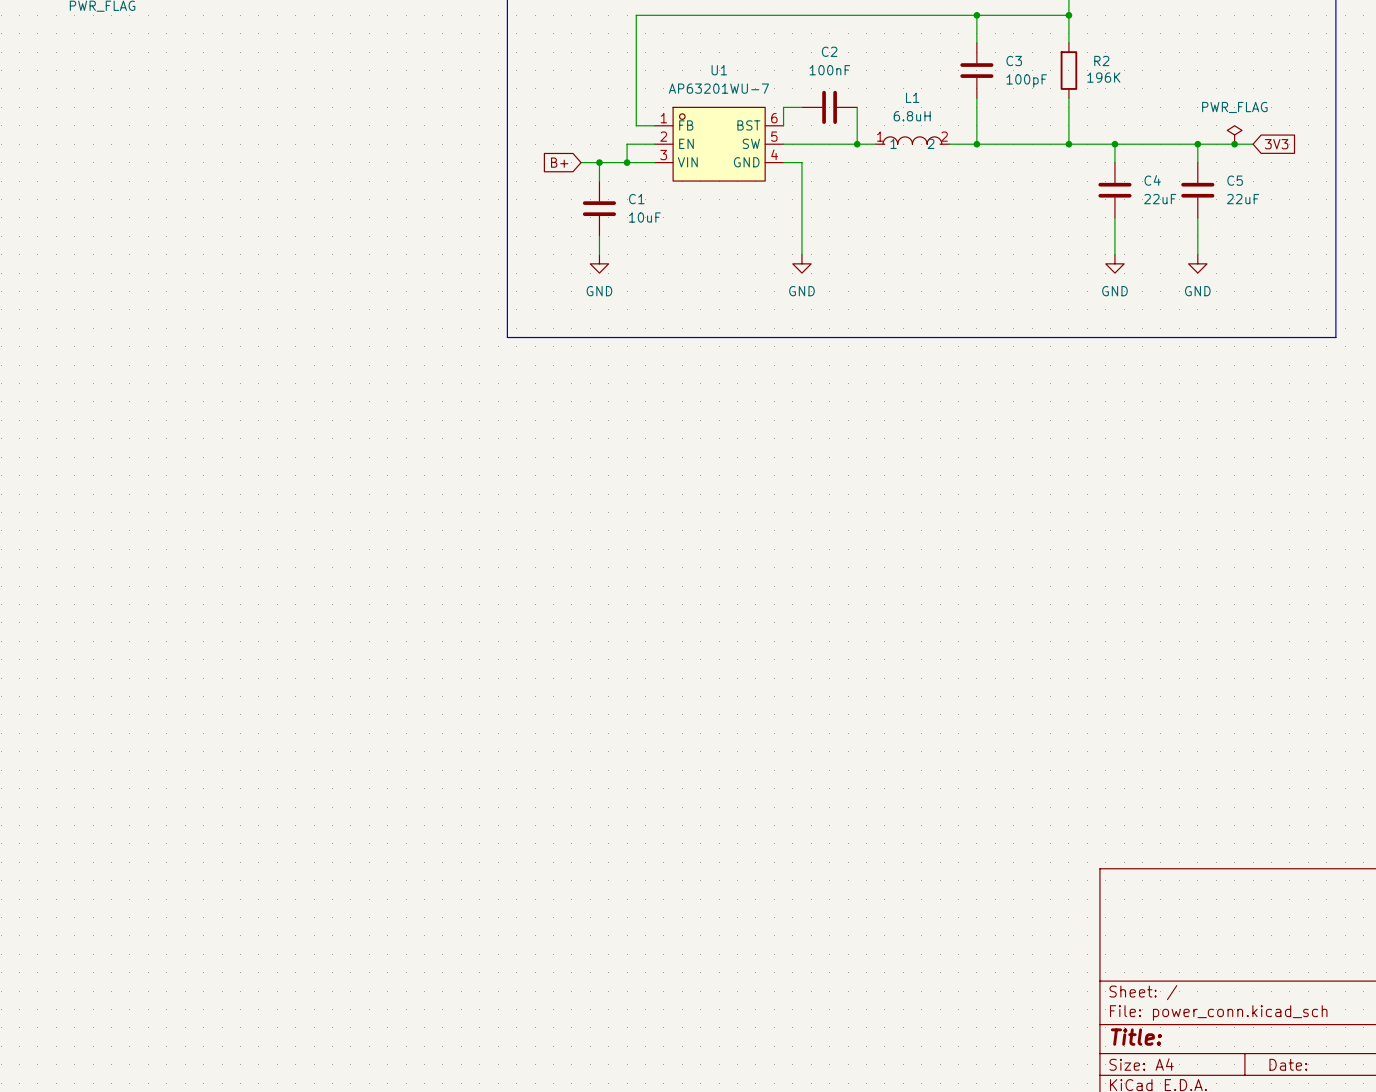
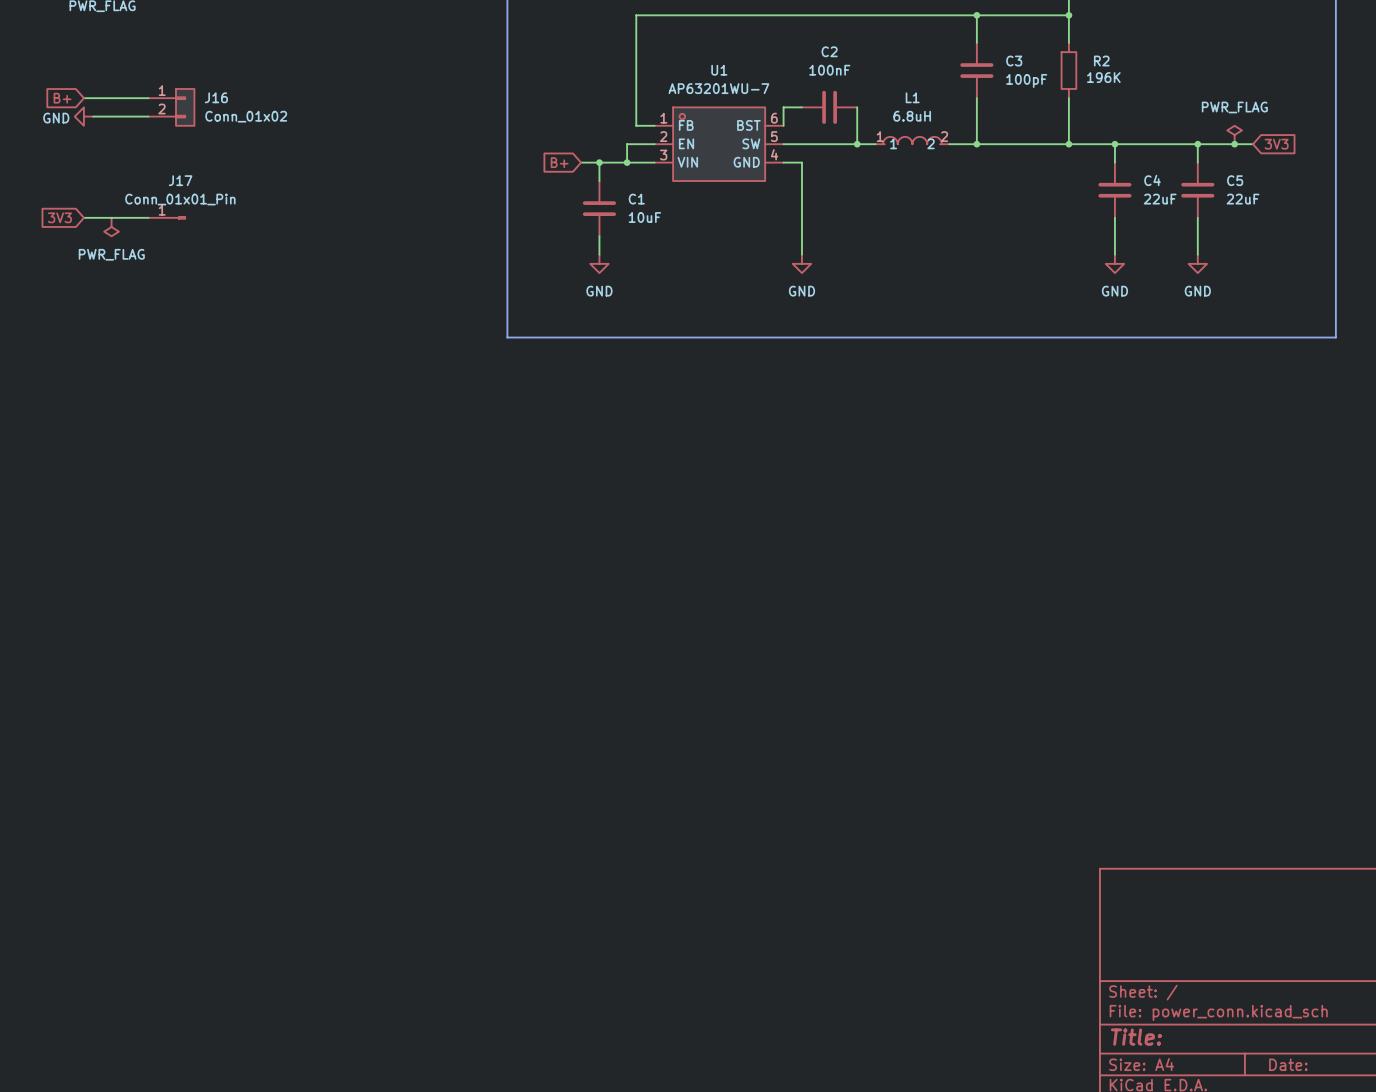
global label: none -> B+ (62, 98)
wire: none -> (83, 98) (148, 98)
J16: none -> Conn_01x02 (171, 107)
power symbol: none -> GND (83, 116)
wire: none -> (93, 116) (148, 116)
global label: none -> 3V3 (59, 217)
wire: none -> (83, 217) (148, 217)
J17: none -> Conn_01x01_Pin (167, 217)
power symbol: none -> PWR_FLAG (111, 227)

